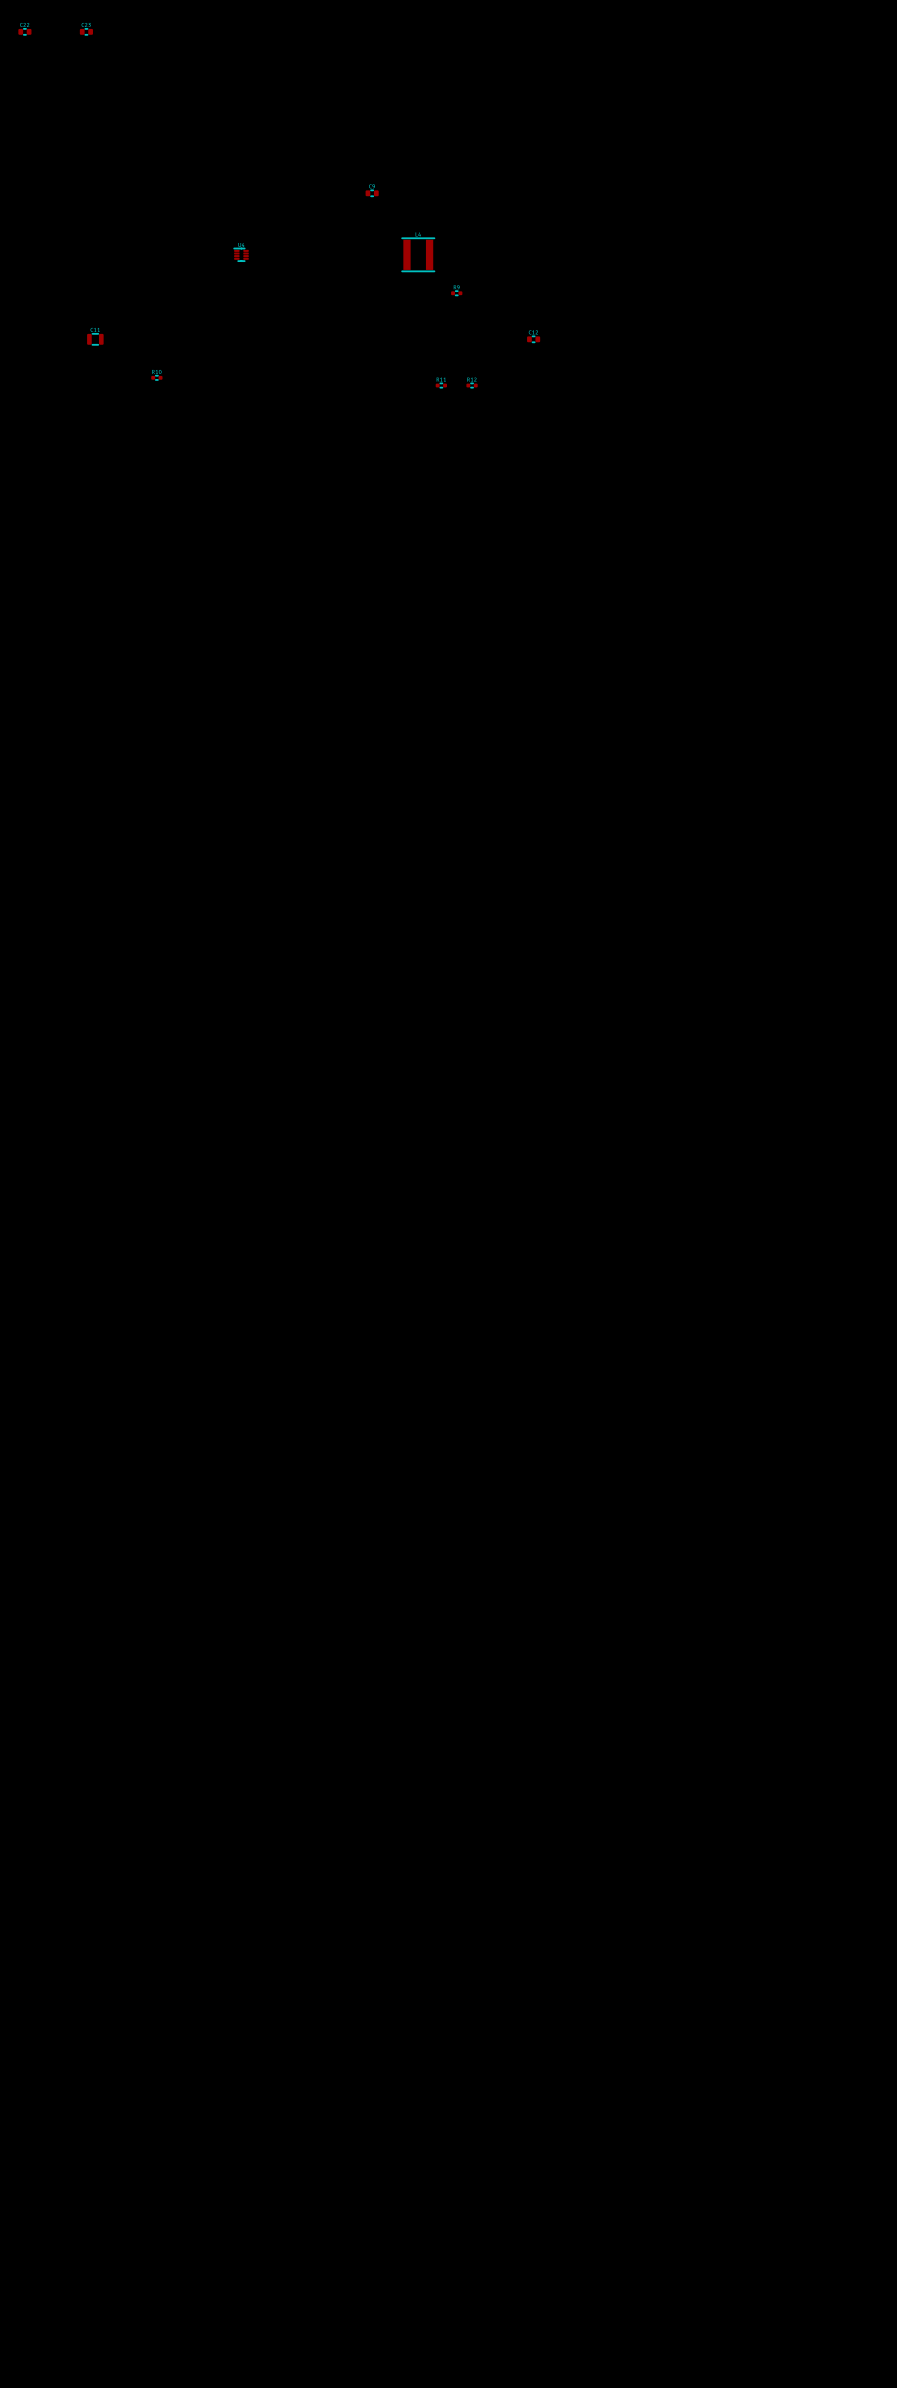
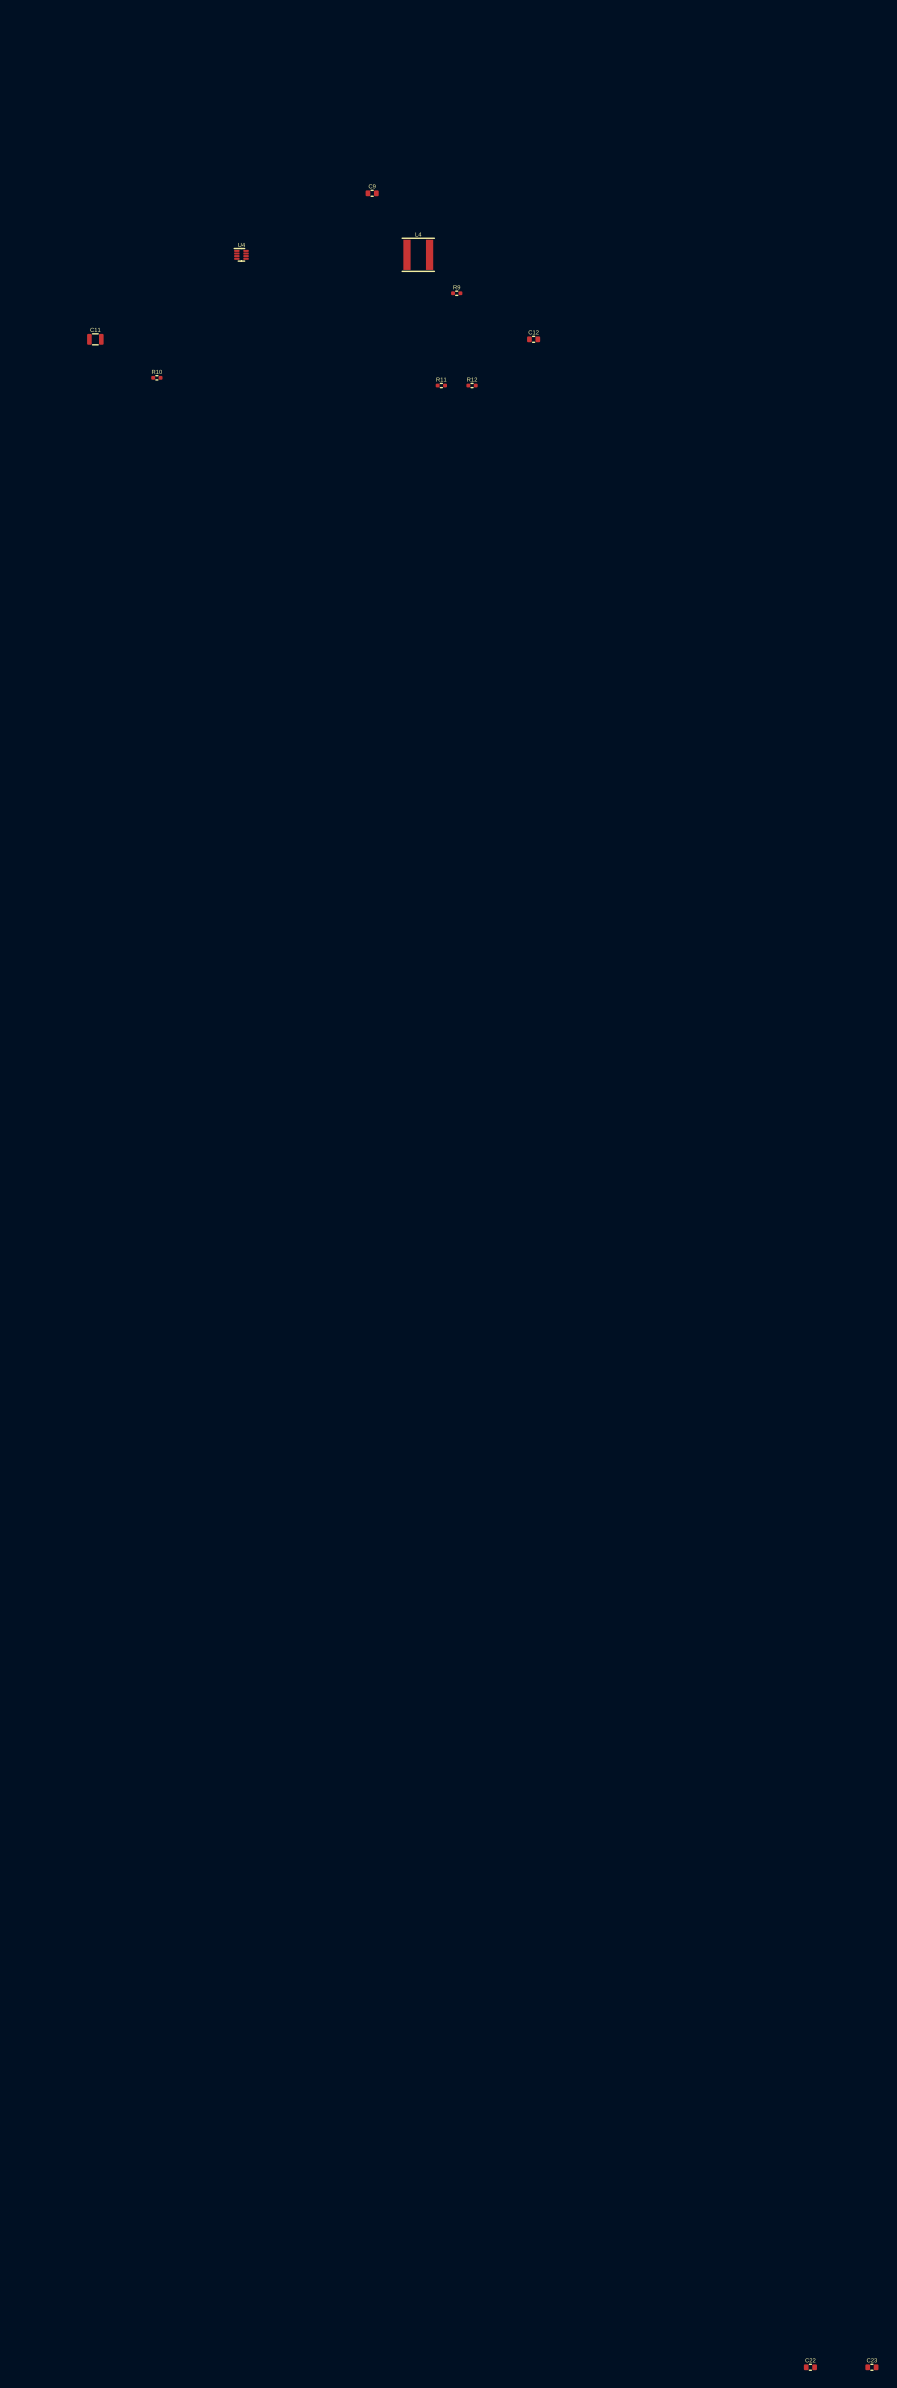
part position: (24, 31) -> (810, 2367)
part position: (86, 31) -> (871, 2367)

